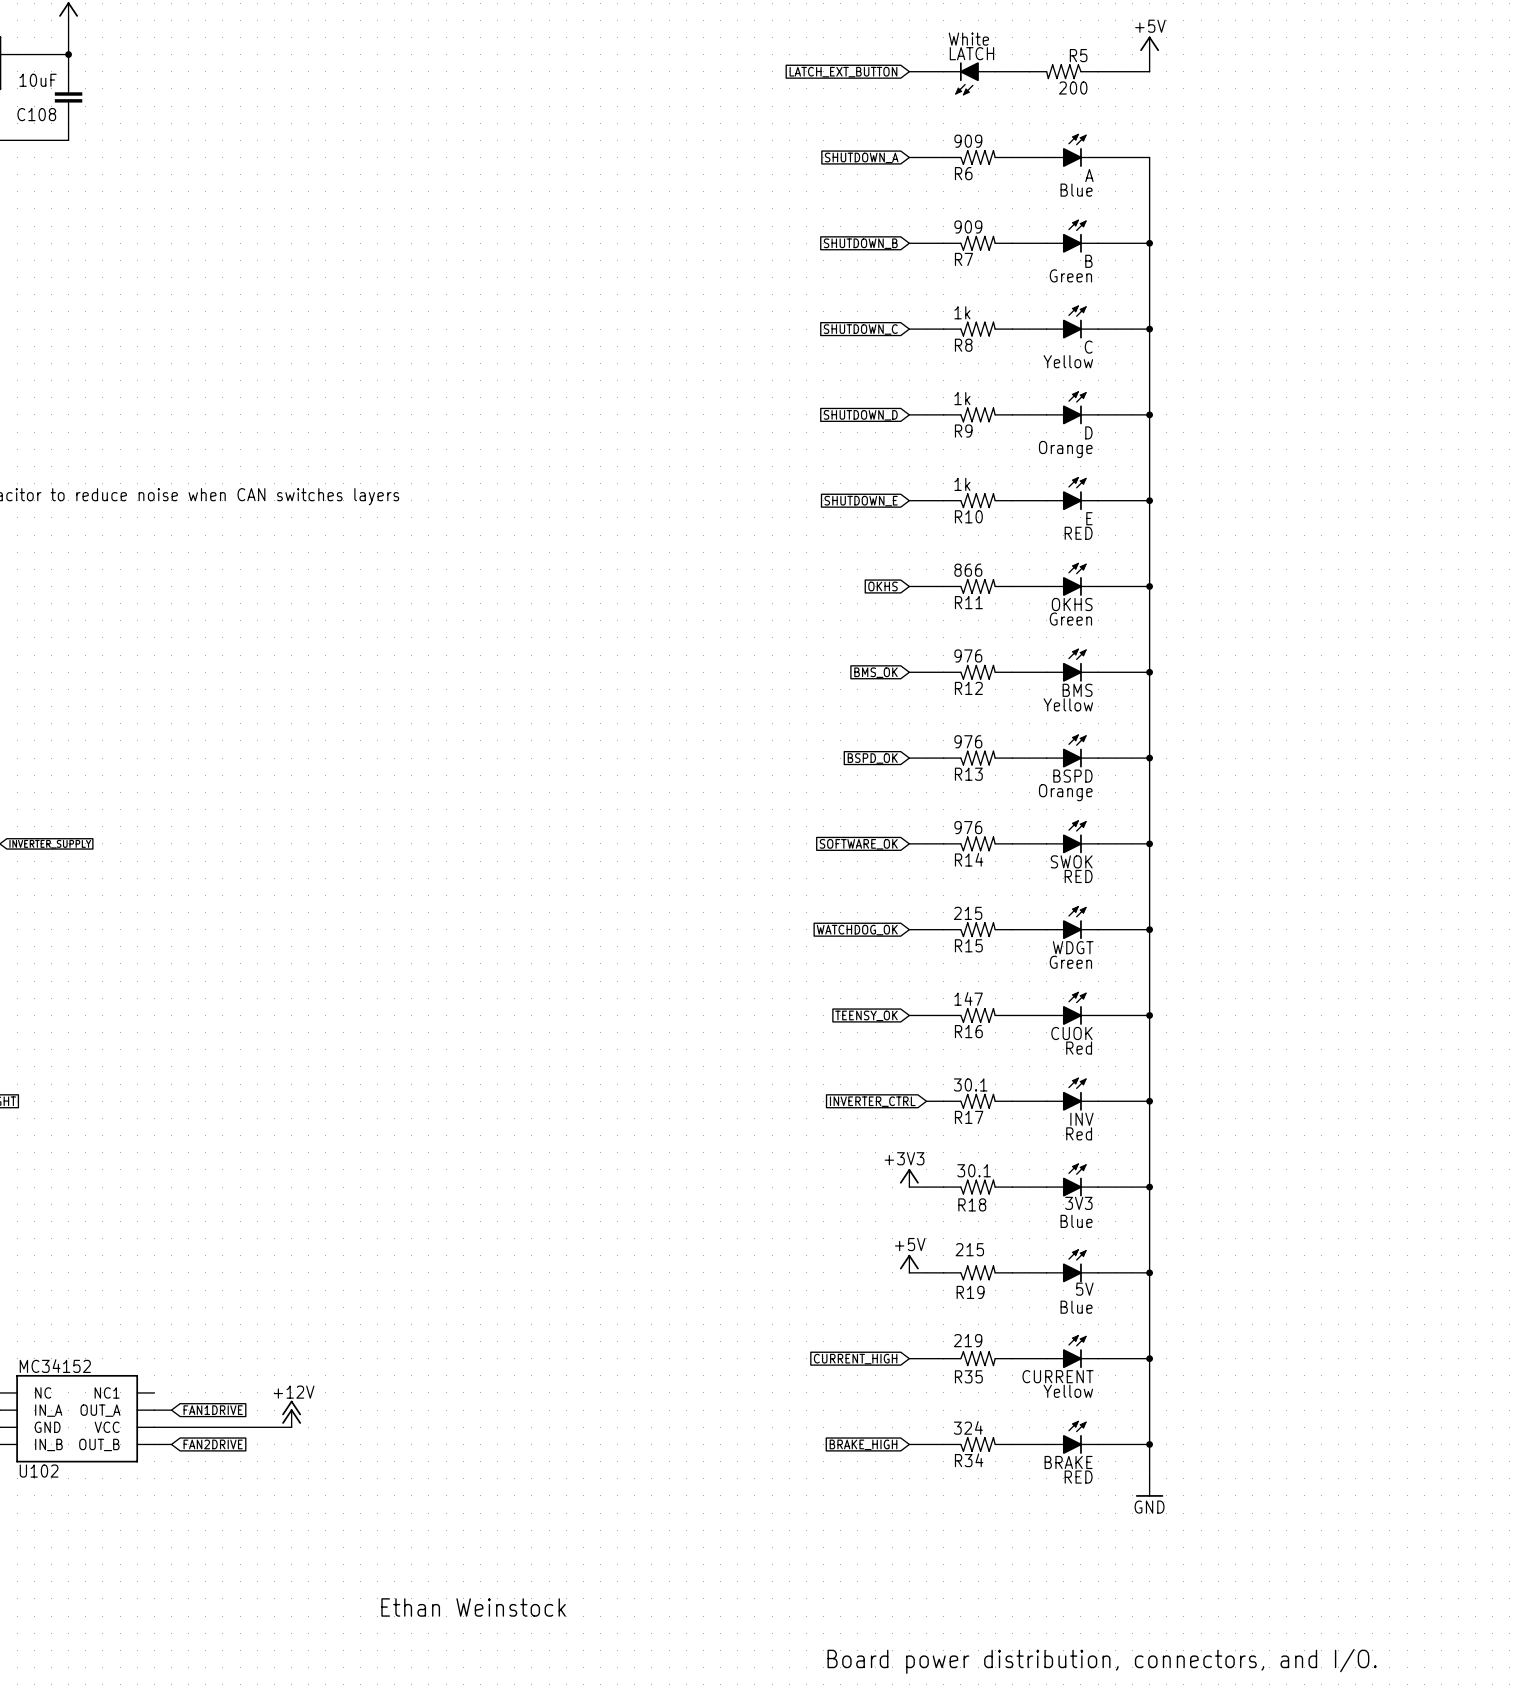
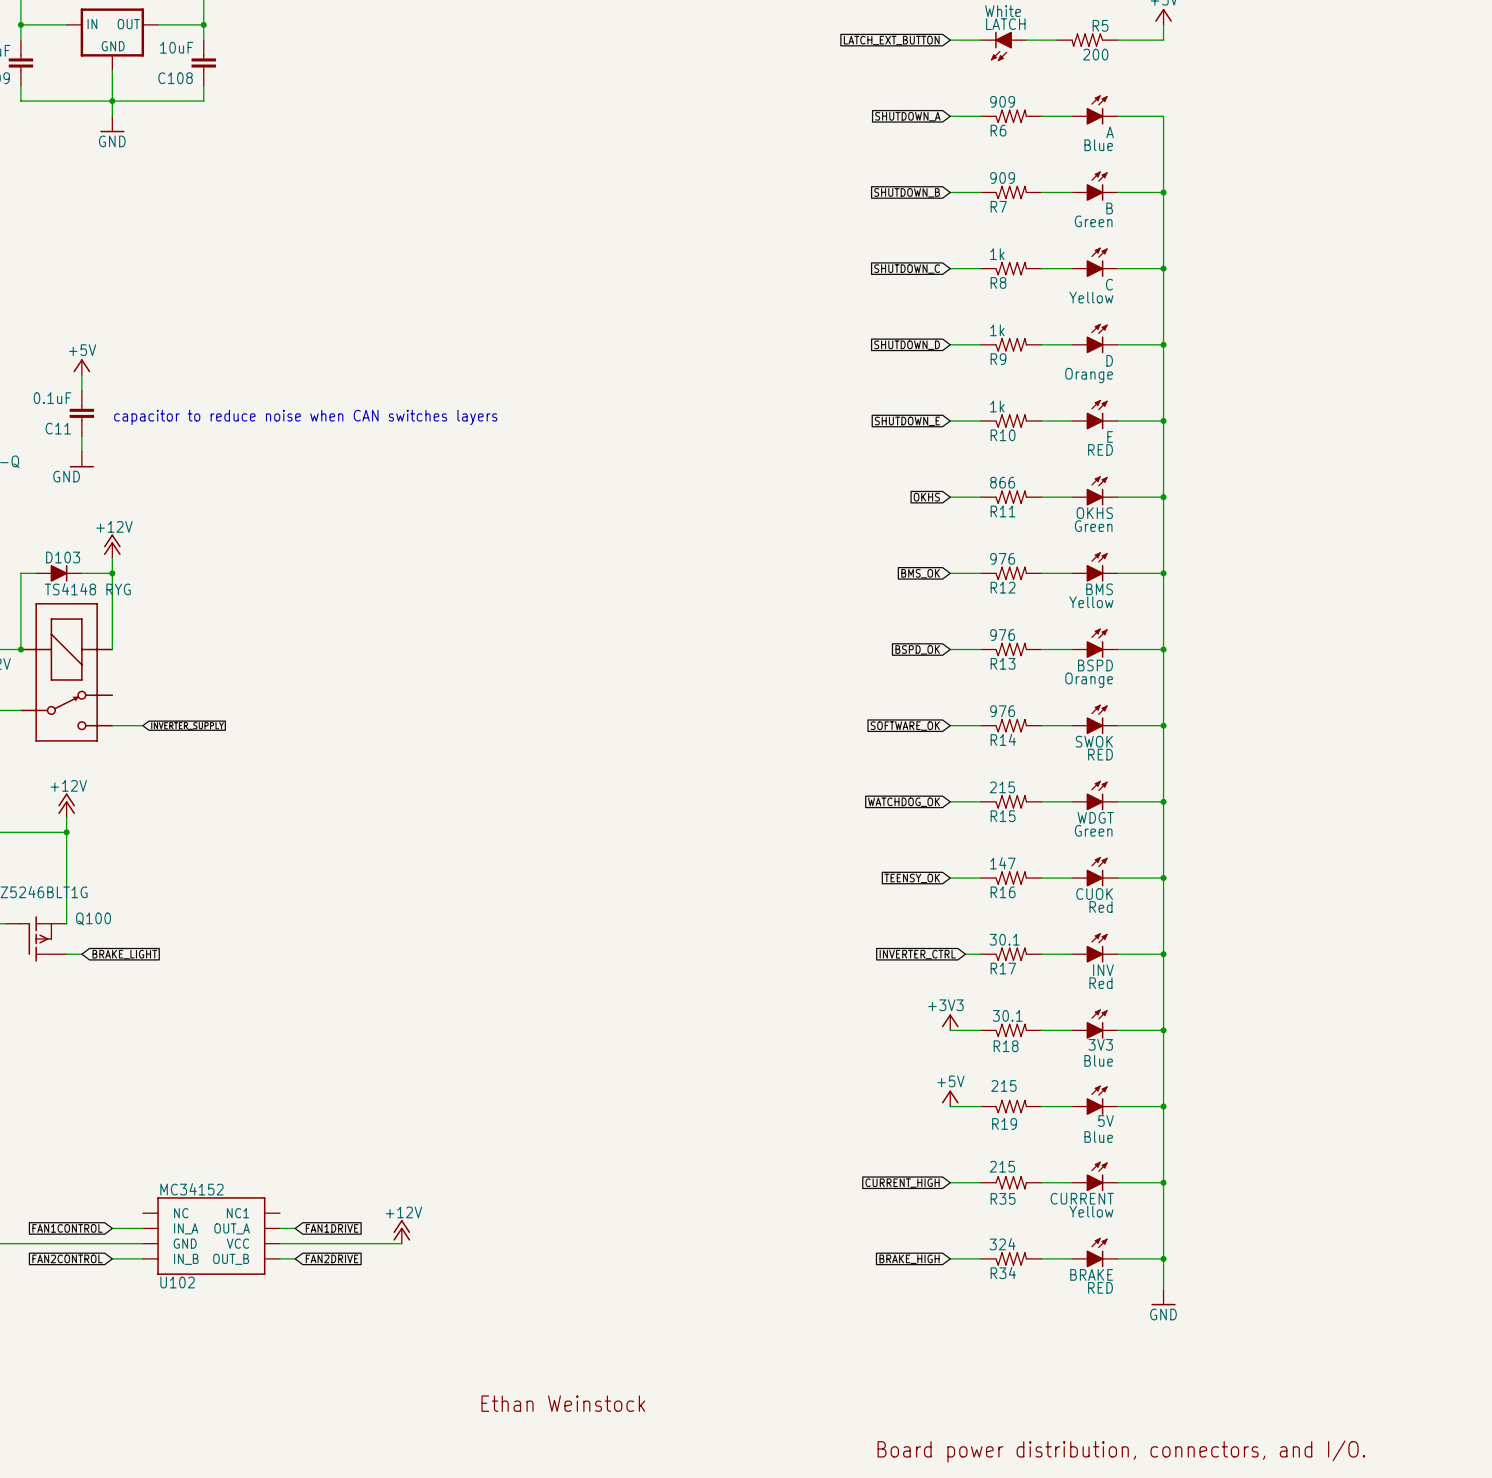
R35 value: 219 (968, 1340) -> 215 (1002, 1166)

